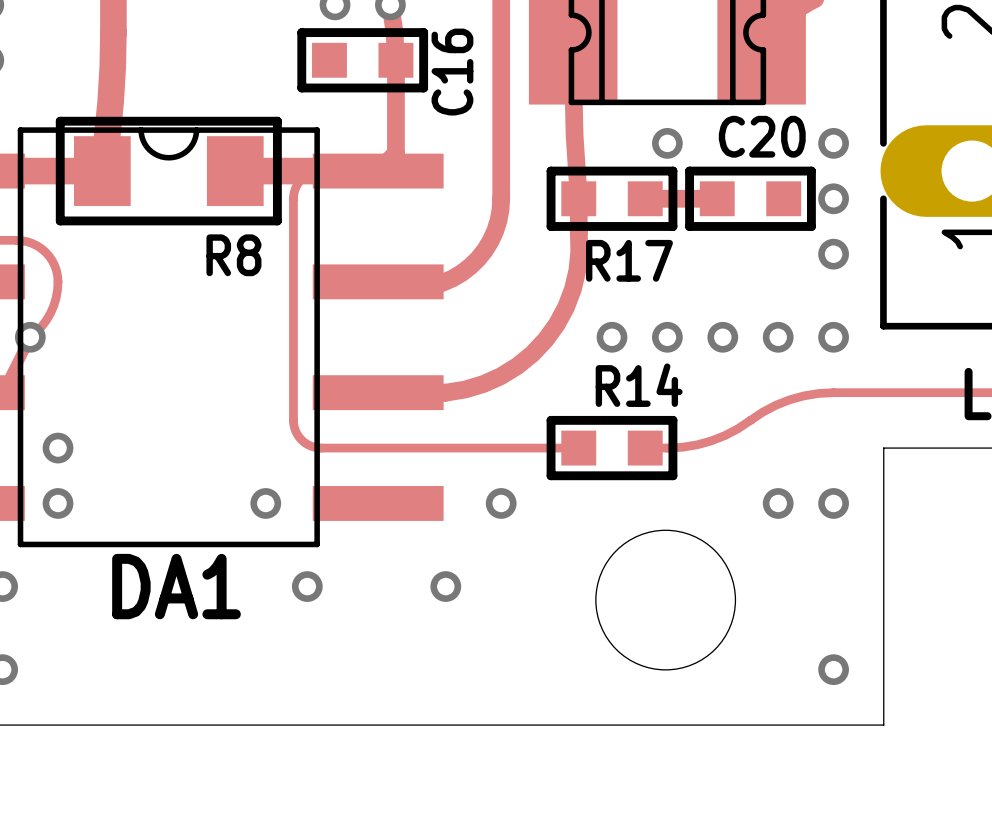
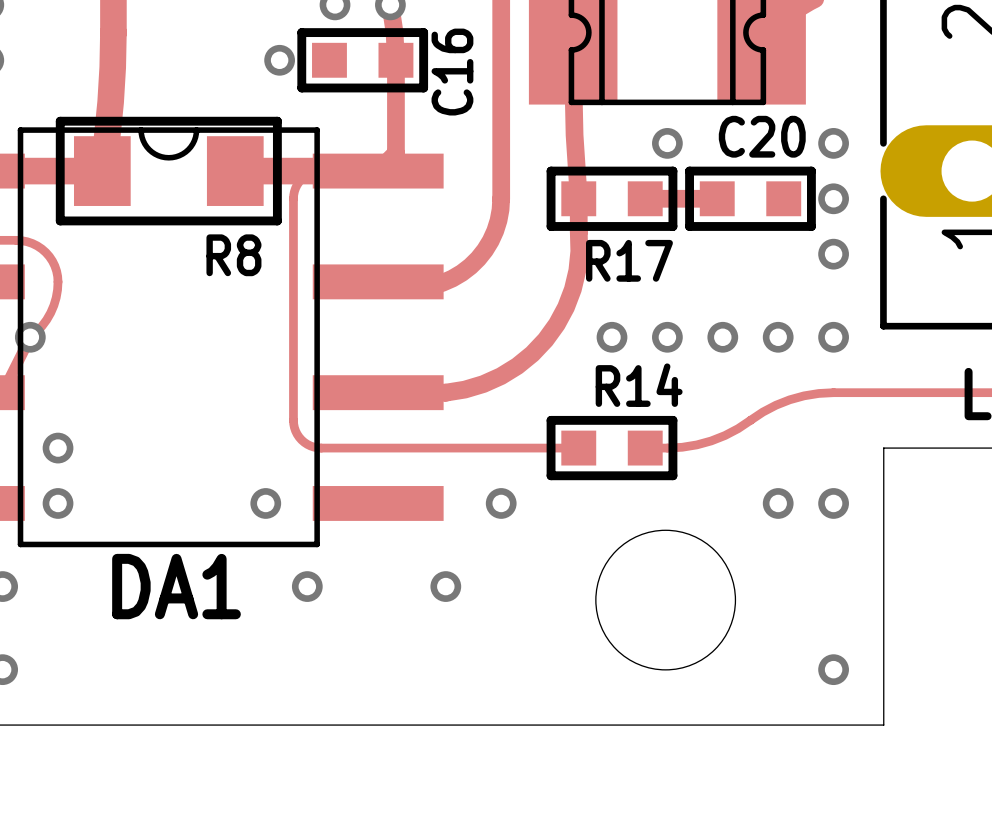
via: none -> (279, 60)

